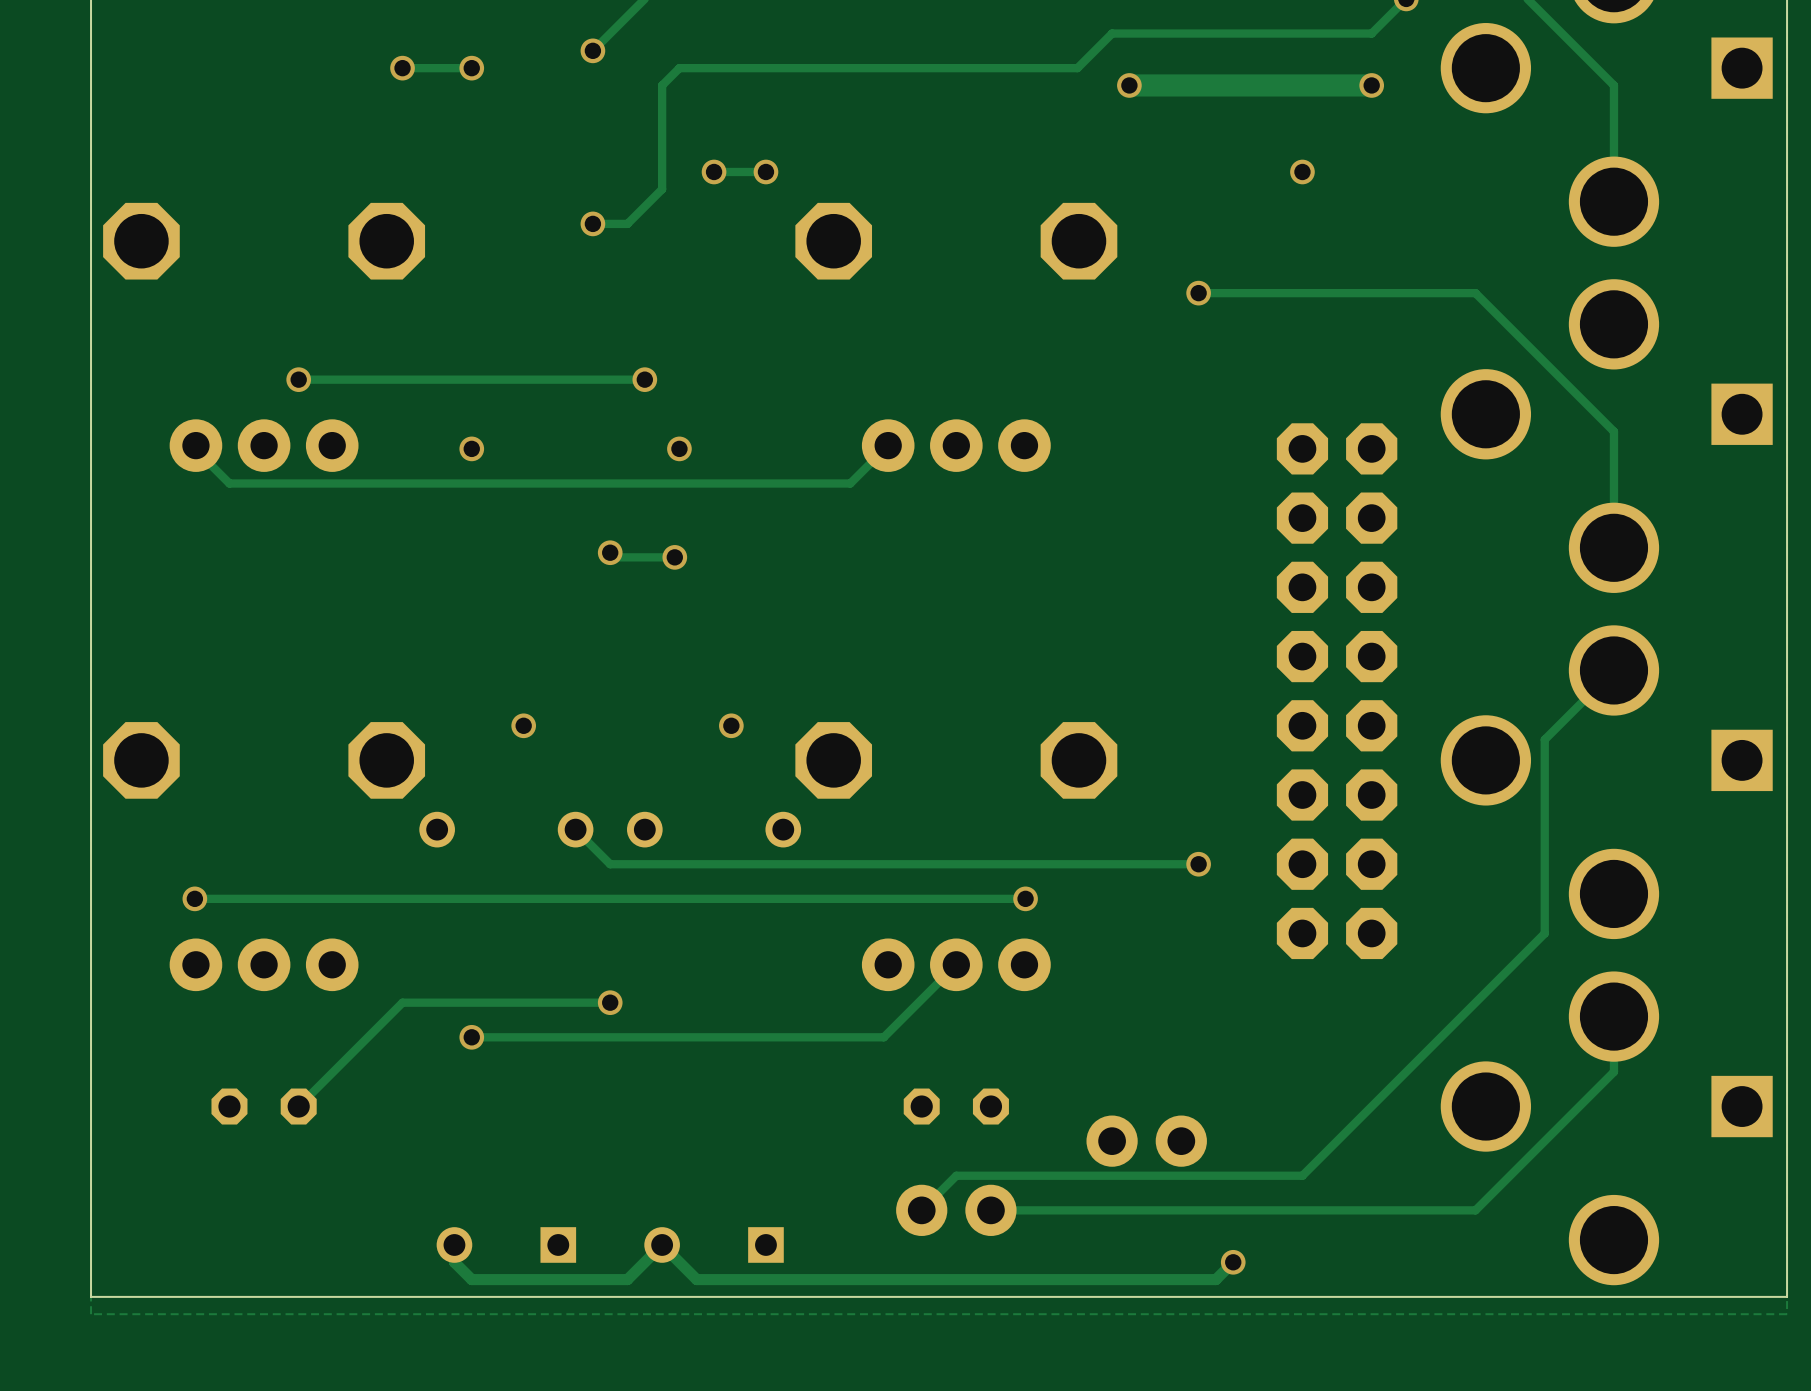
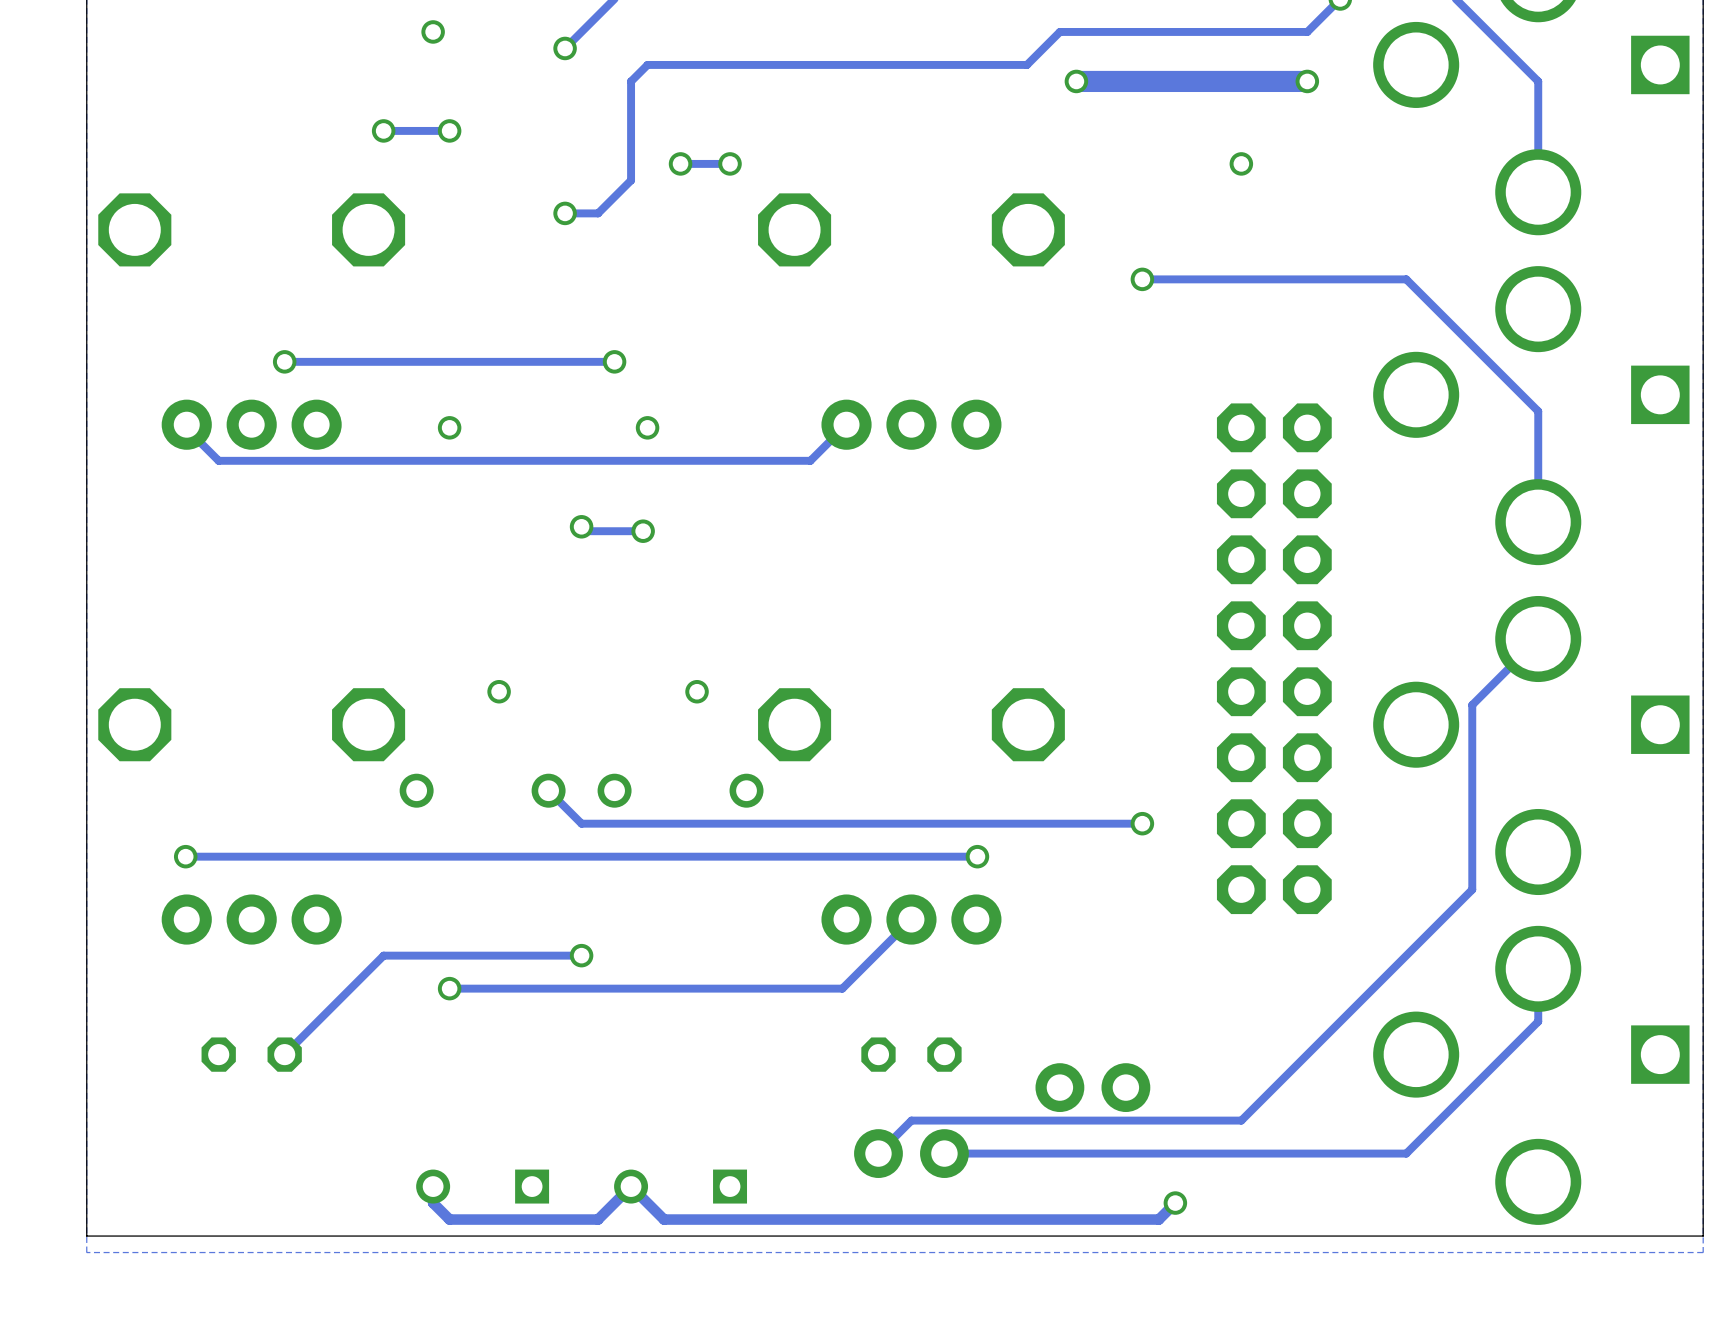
via: none -> (433, 31)
via: (402, 68) -> none
track: (471, 68) (402, 68) -> (449, 130) (383, 130)
via: (471, 68) -> none
via: none -> (383, 130)
via: none -> (449, 130)

